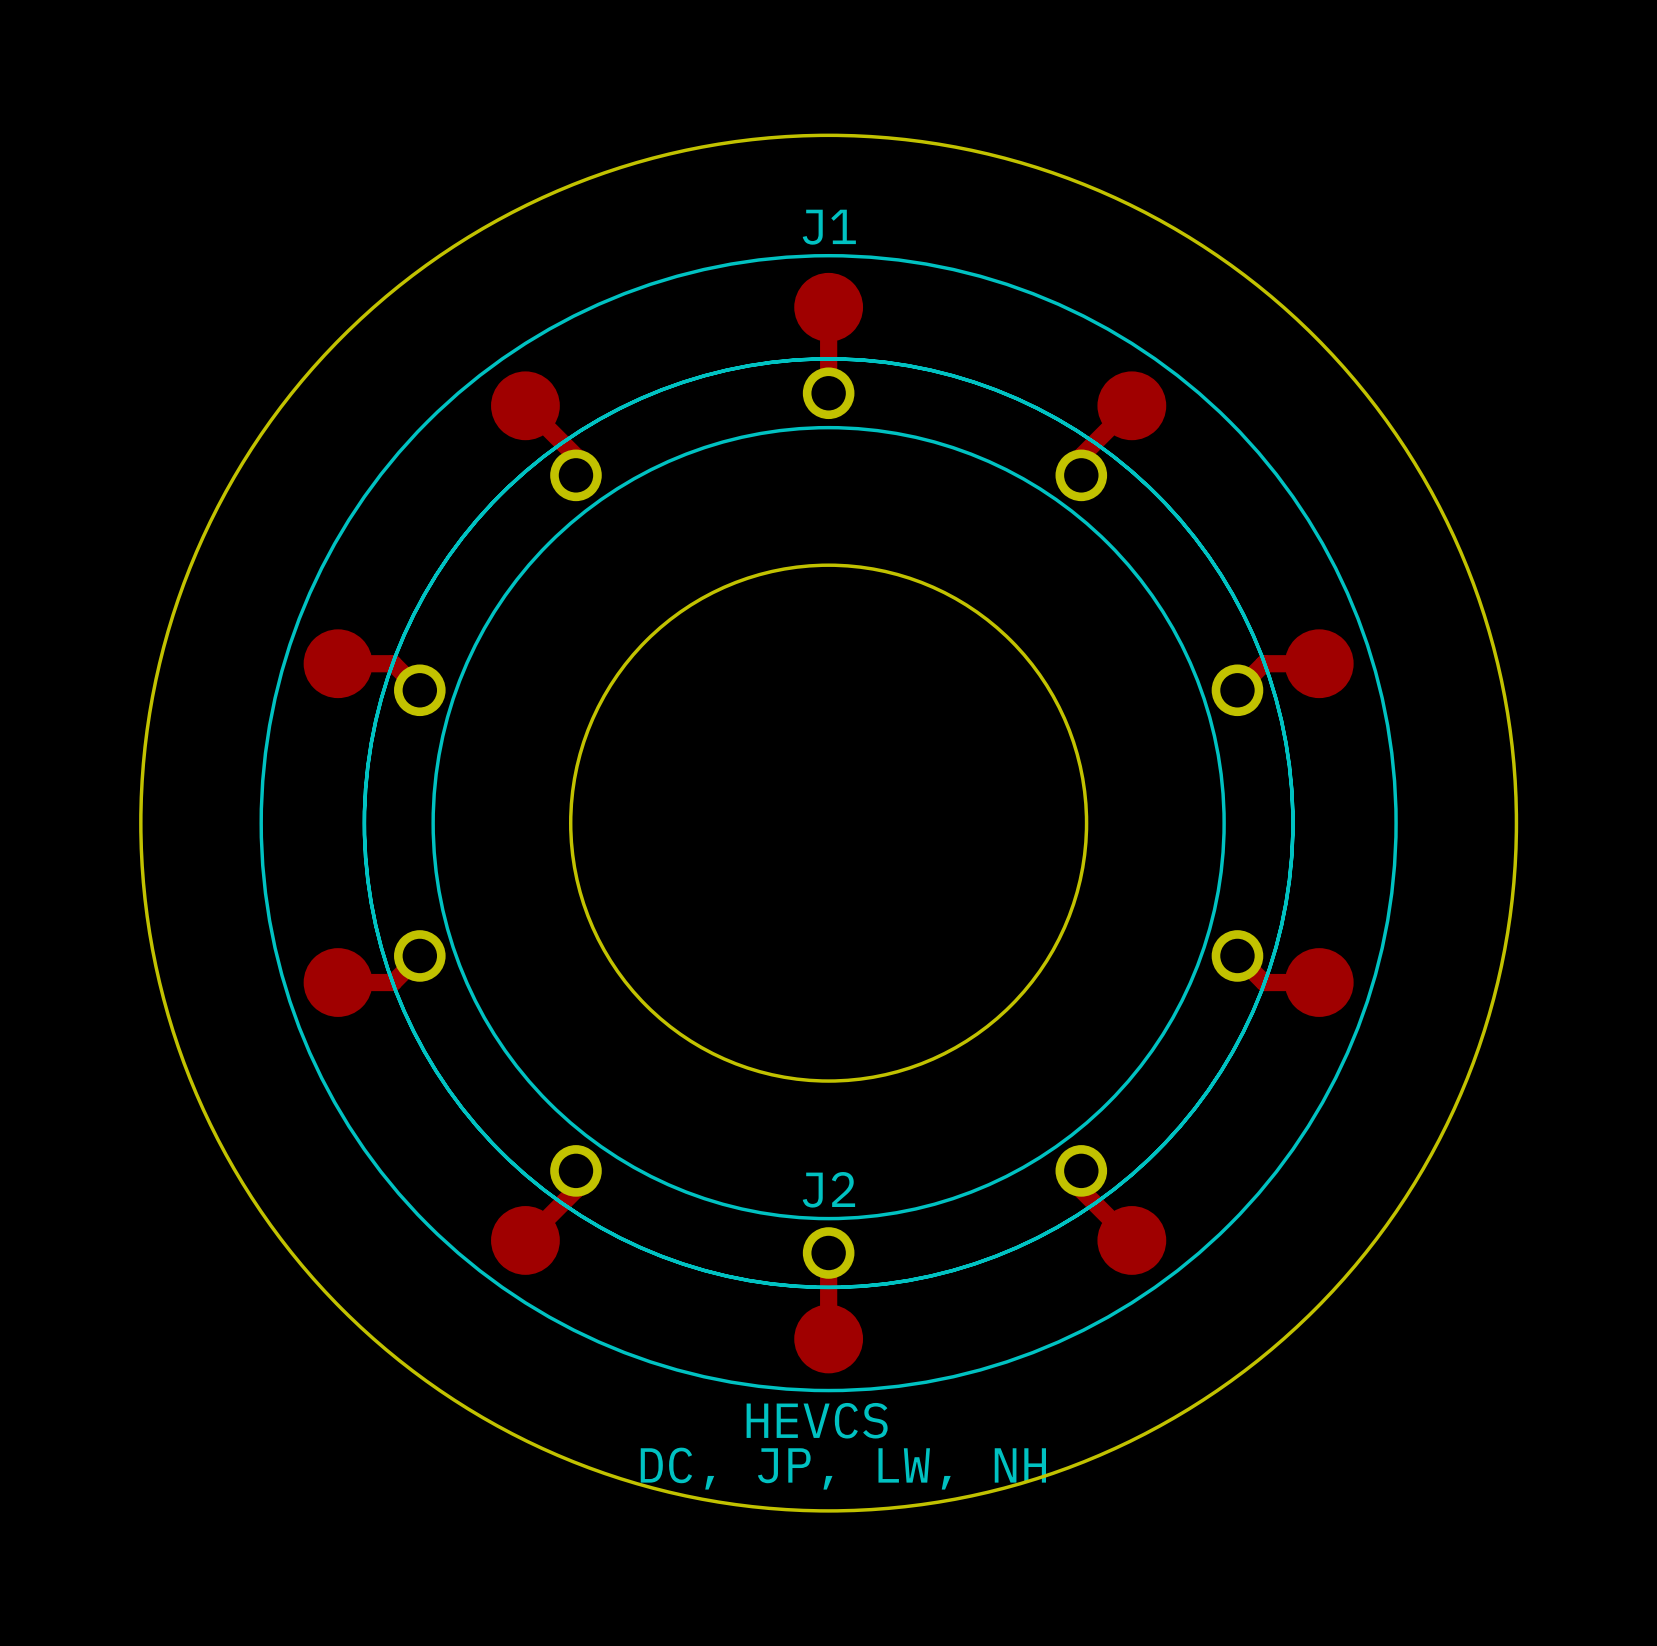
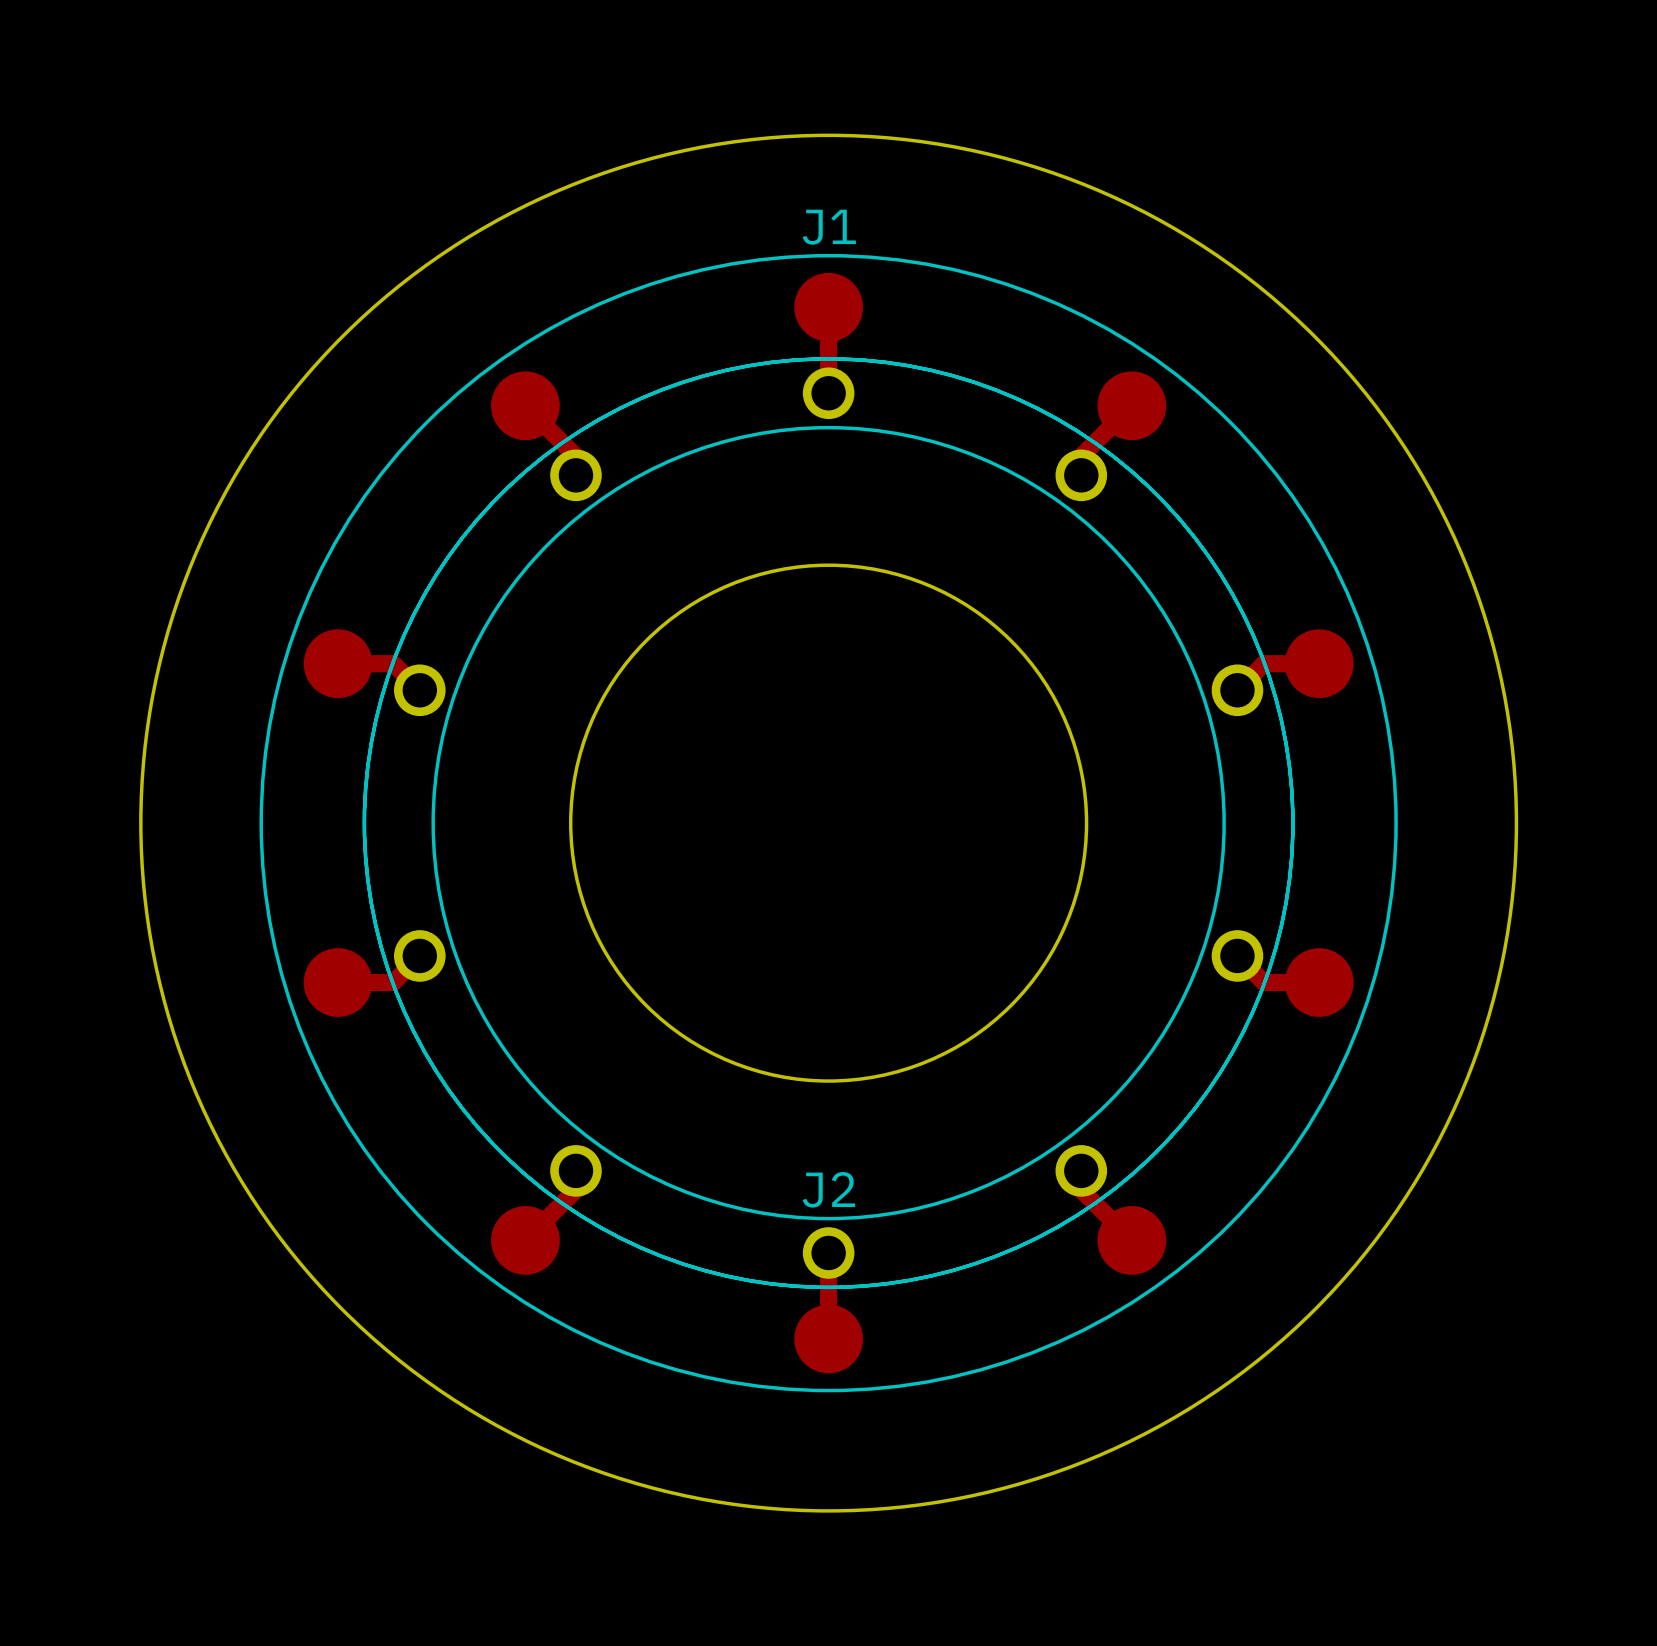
text: HEVCS (817, 1420) -> none
text: DC, JP, LW, NH (843, 1468) -> none

